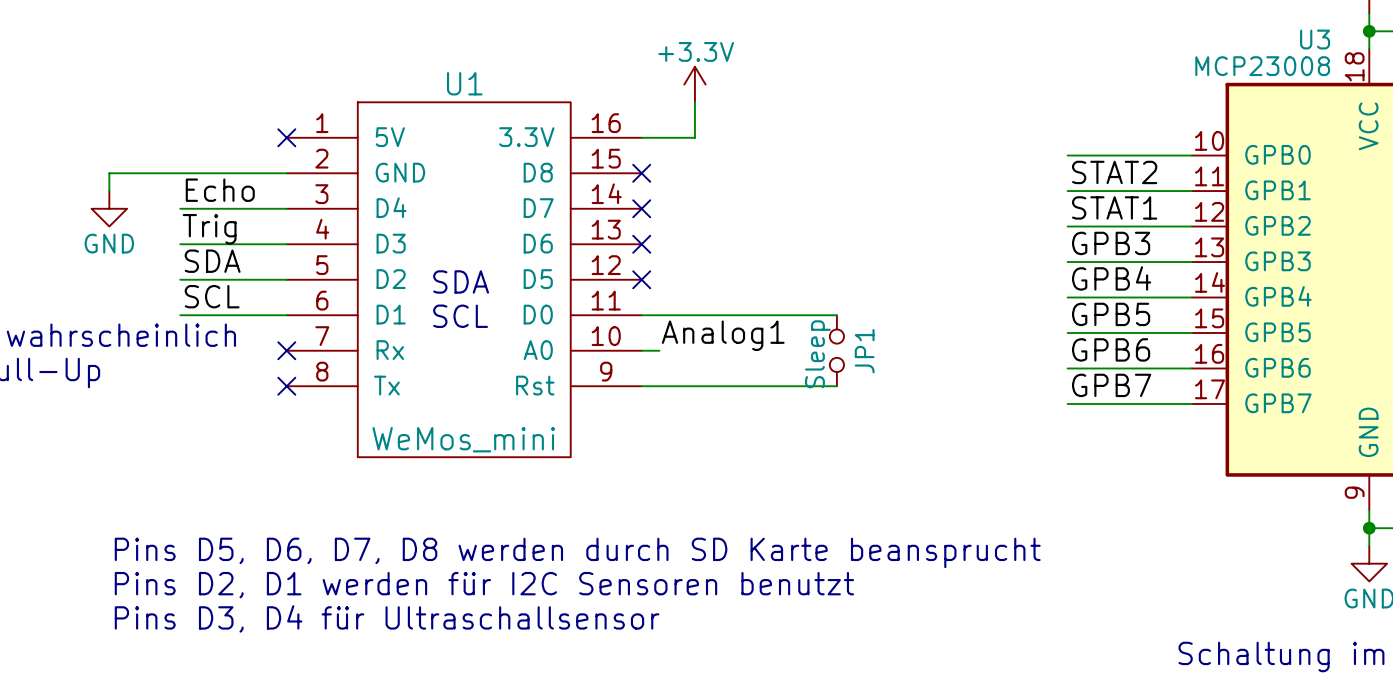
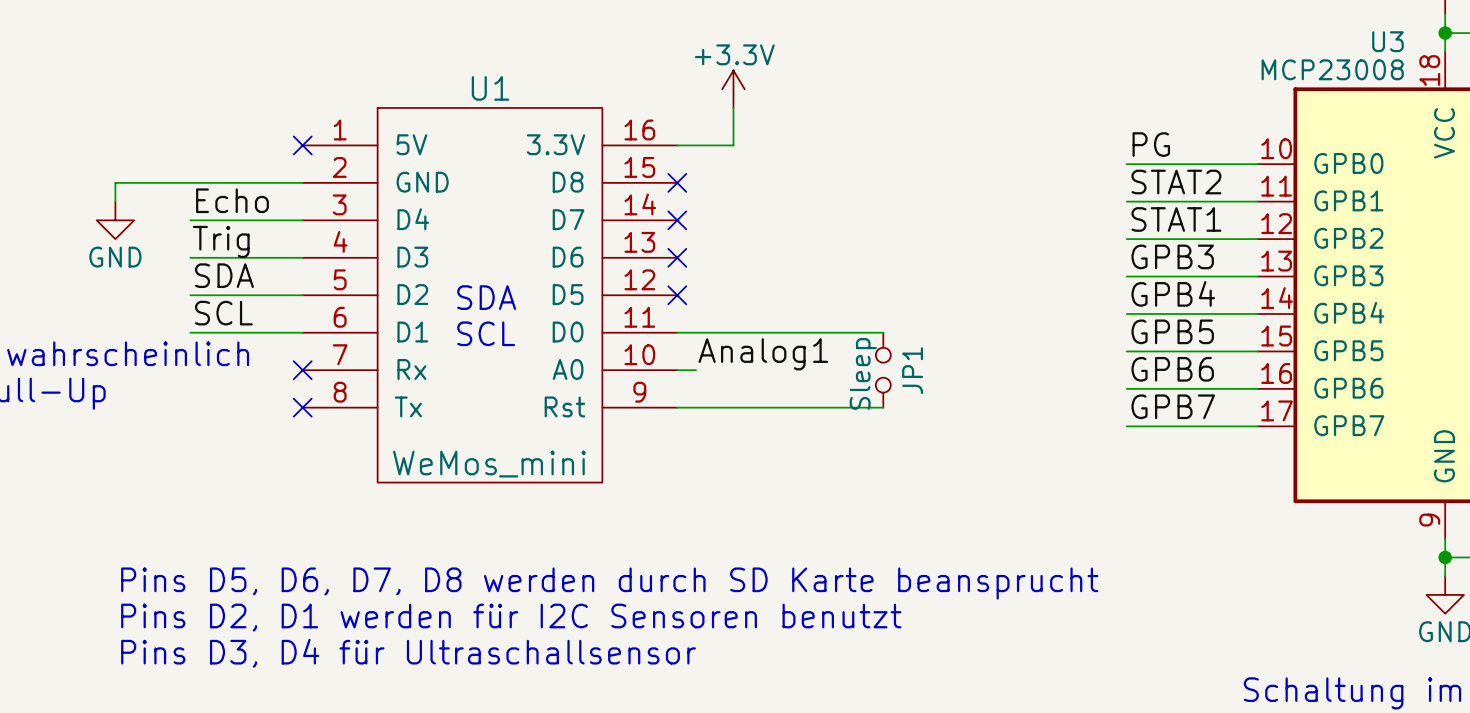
label: none -> PG (1151, 144)

